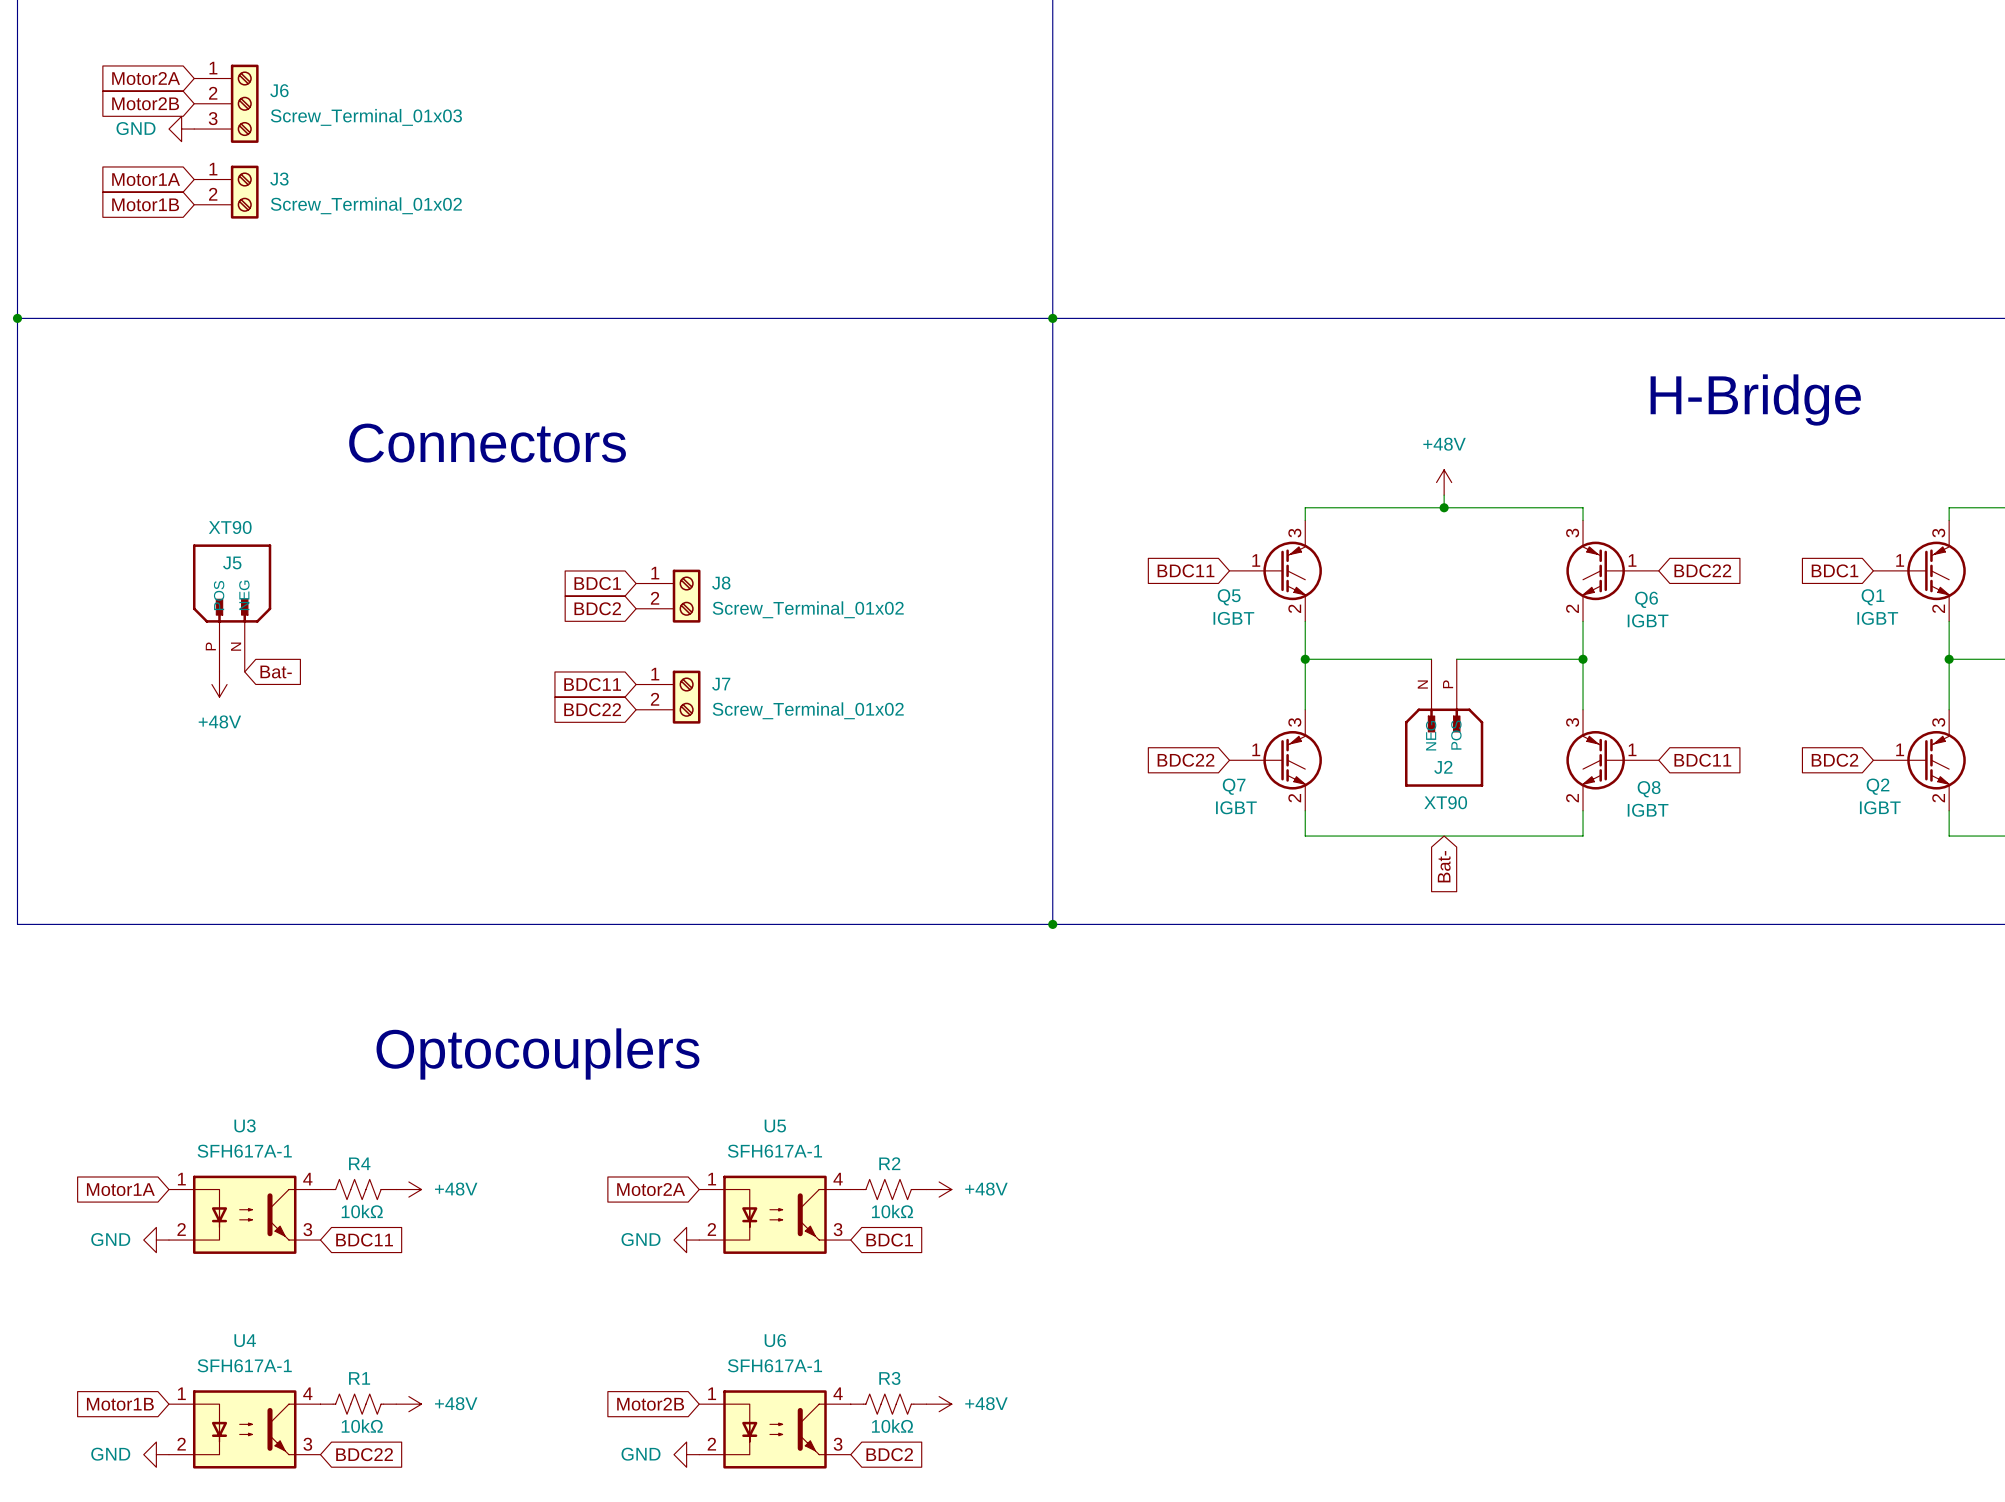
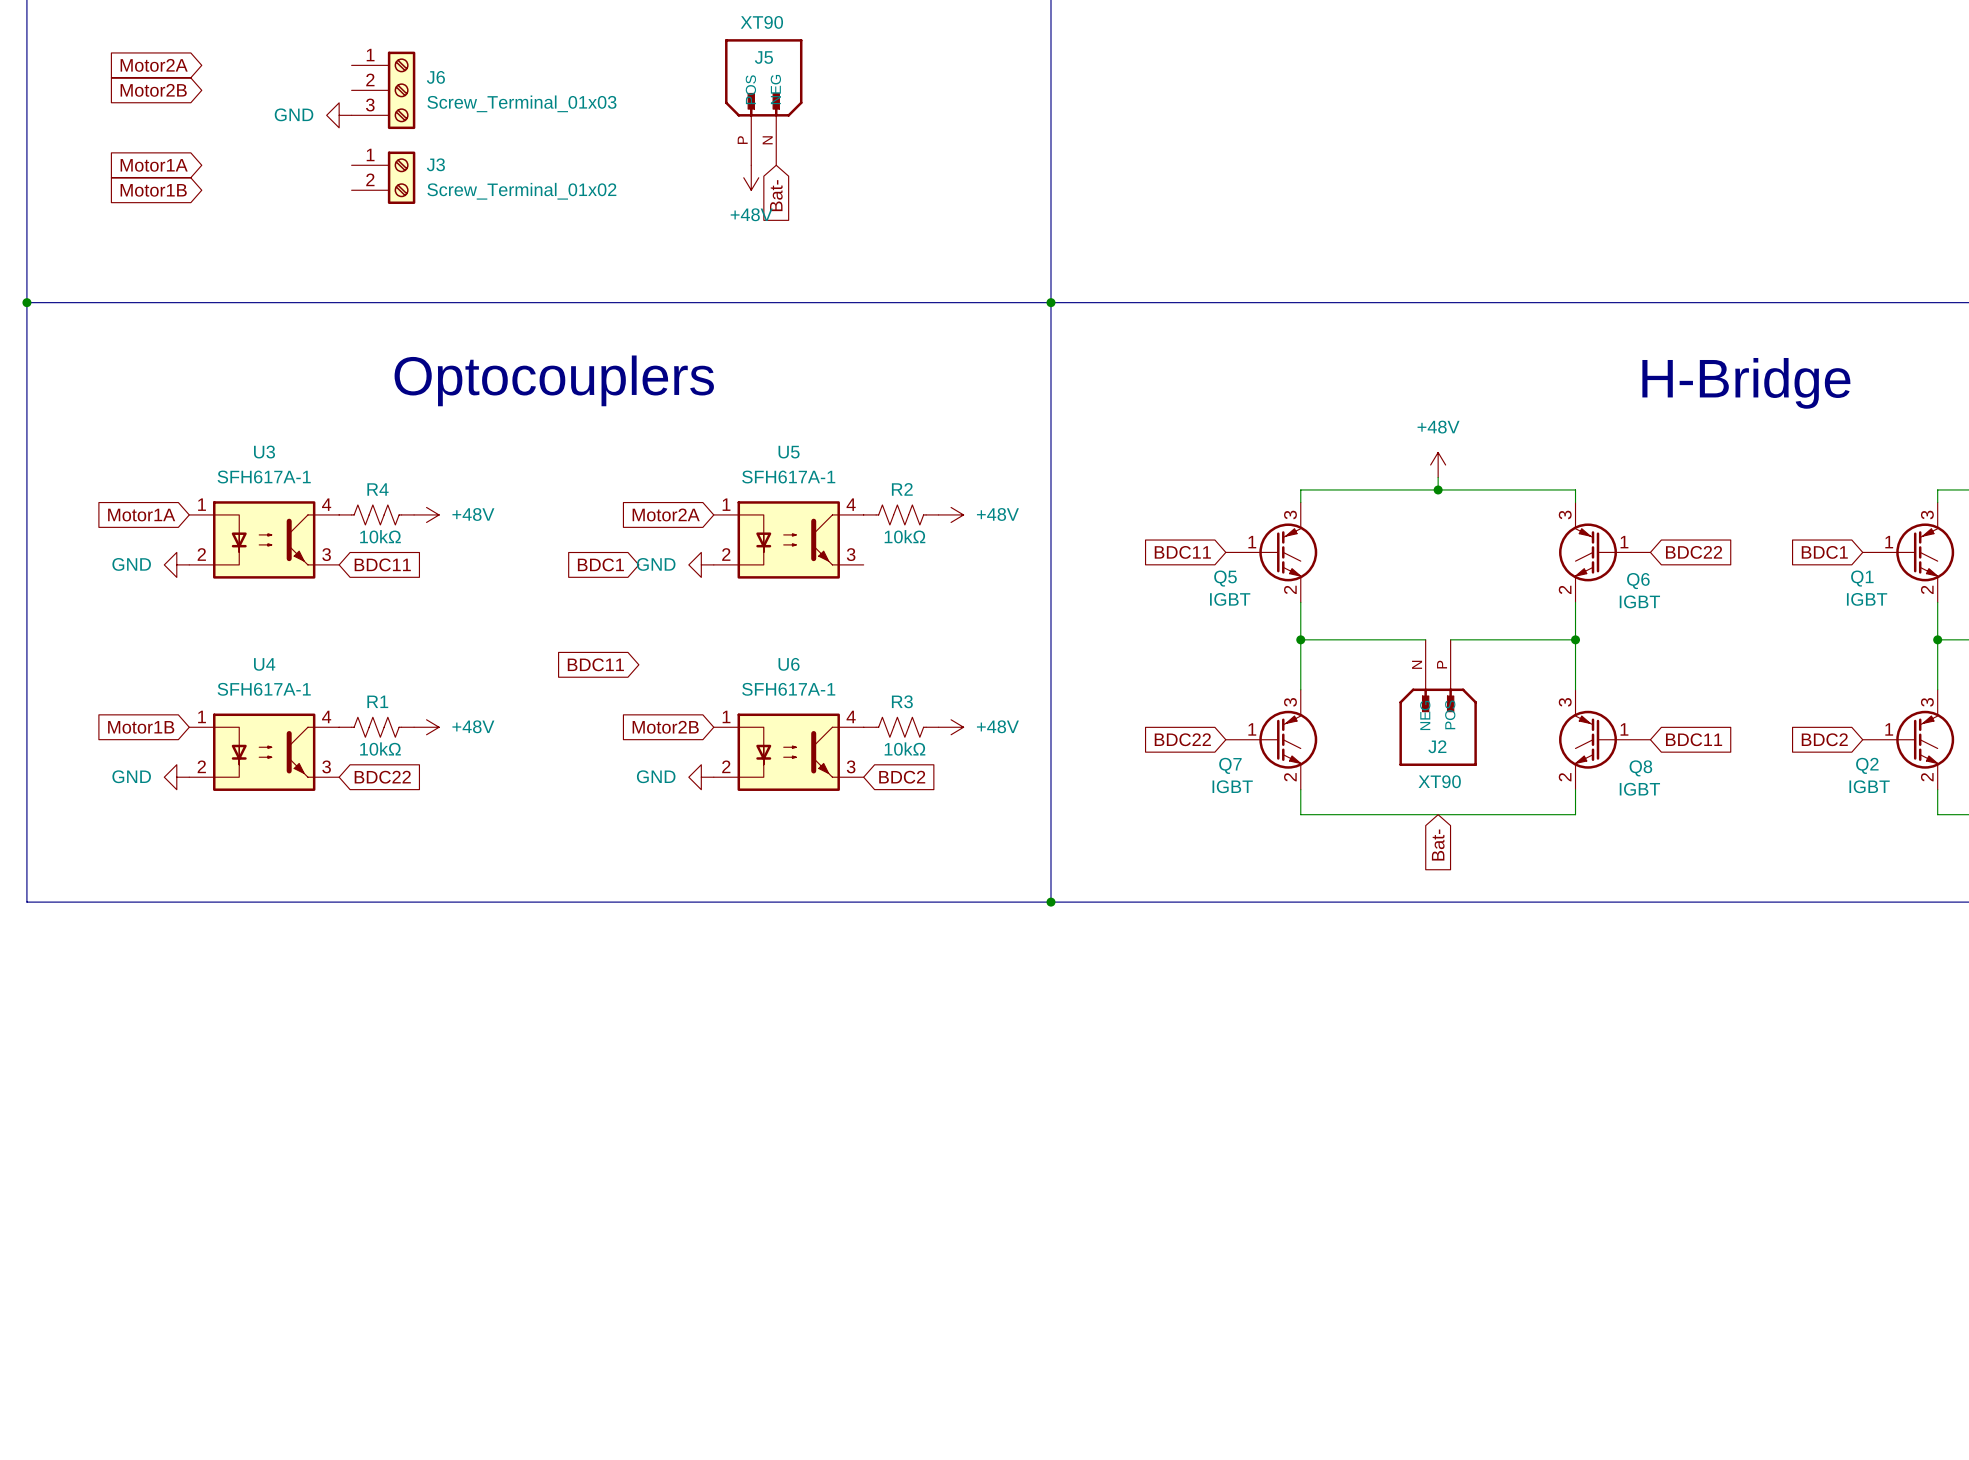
J6 position: (226, 103) -> (383, 90)
power symbol position: GND (181, 129) -> GND (339, 115)
J3 position: (226, 192) -> (383, 177)
power symbol: none -> +48V (751, 177)
global label: none -> Bat- (776, 195)
text: none -> Optocouplers (554, 380)
text: Connectors (487, 443) -> none
global label: none -> Motor1A (141, 515)
power symbol: none -> +48V (426, 514)
global label: none -> Motor2A (666, 514)
power symbol: none -> +48V (951, 514)
power symbol: none -> GND (176, 564)
global label: none -> BDC11 (382, 564)
power symbol: none -> GND (701, 564)
J8: Screw_Terminal_01x02 (668, 596) -> none
J5 position: (232, 608) -> (763, 102)
global label: BDC2 (597, 608) -> none
global label: Bat- (276, 671) -> none
power symbol: +48V (219, 684) -> none
J7: Screw_Terminal_01x02 (668, 697) -> none
global label: BDC22 (592, 709) -> none
global label: none -> Motor1B (141, 727)
power symbol: none -> +48V (426, 727)
global label: none -> Motor2B (665, 727)
power symbol: none -> +48V (951, 727)
power symbol: none -> GND (176, 777)
global label: none -> BDC22 (382, 777)
power symbol: none -> GND (701, 777)
global label: none -> BDC2 (902, 777)
text: Optocouplers (537, 1053) -> none
global label: Motor1A (120, 1189) -> none
R4 position: (358, 1189) -> (376, 514)
power symbol: +48V (408, 1189) -> none
global label: Motor2A (651, 1189) -> none
R2 position: (888, 1189) -> (901, 514)
power symbol: +48V (939, 1189) -> none
U3 position: (244, 1214) -> (264, 539)
U5 position: (775, 1214) -> (788, 539)
power symbol: GND (156, 1240) -> none
global label: BDC11 (364, 1240) -> none
power symbol: GND (686, 1240) -> none
global label: BDC1 (889, 1240) -> none
global label: Motor1B (120, 1404) -> none
R1 position: (358, 1404) -> (376, 727)
power symbol: +48V (408, 1404) -> none
global label: Motor2B (650, 1404) -> none
R3 position: (888, 1404) -> (901, 727)
power symbol: +48V (939, 1404) -> none
U4 position: (244, 1429) -> (264, 752)
U6 position: (775, 1429) -> (788, 752)
power symbol: GND (156, 1454) -> none
global label: BDC22 (364, 1454) -> none
power symbol: GND (686, 1454) -> none
global label: BDC2 (889, 1454) -> none

